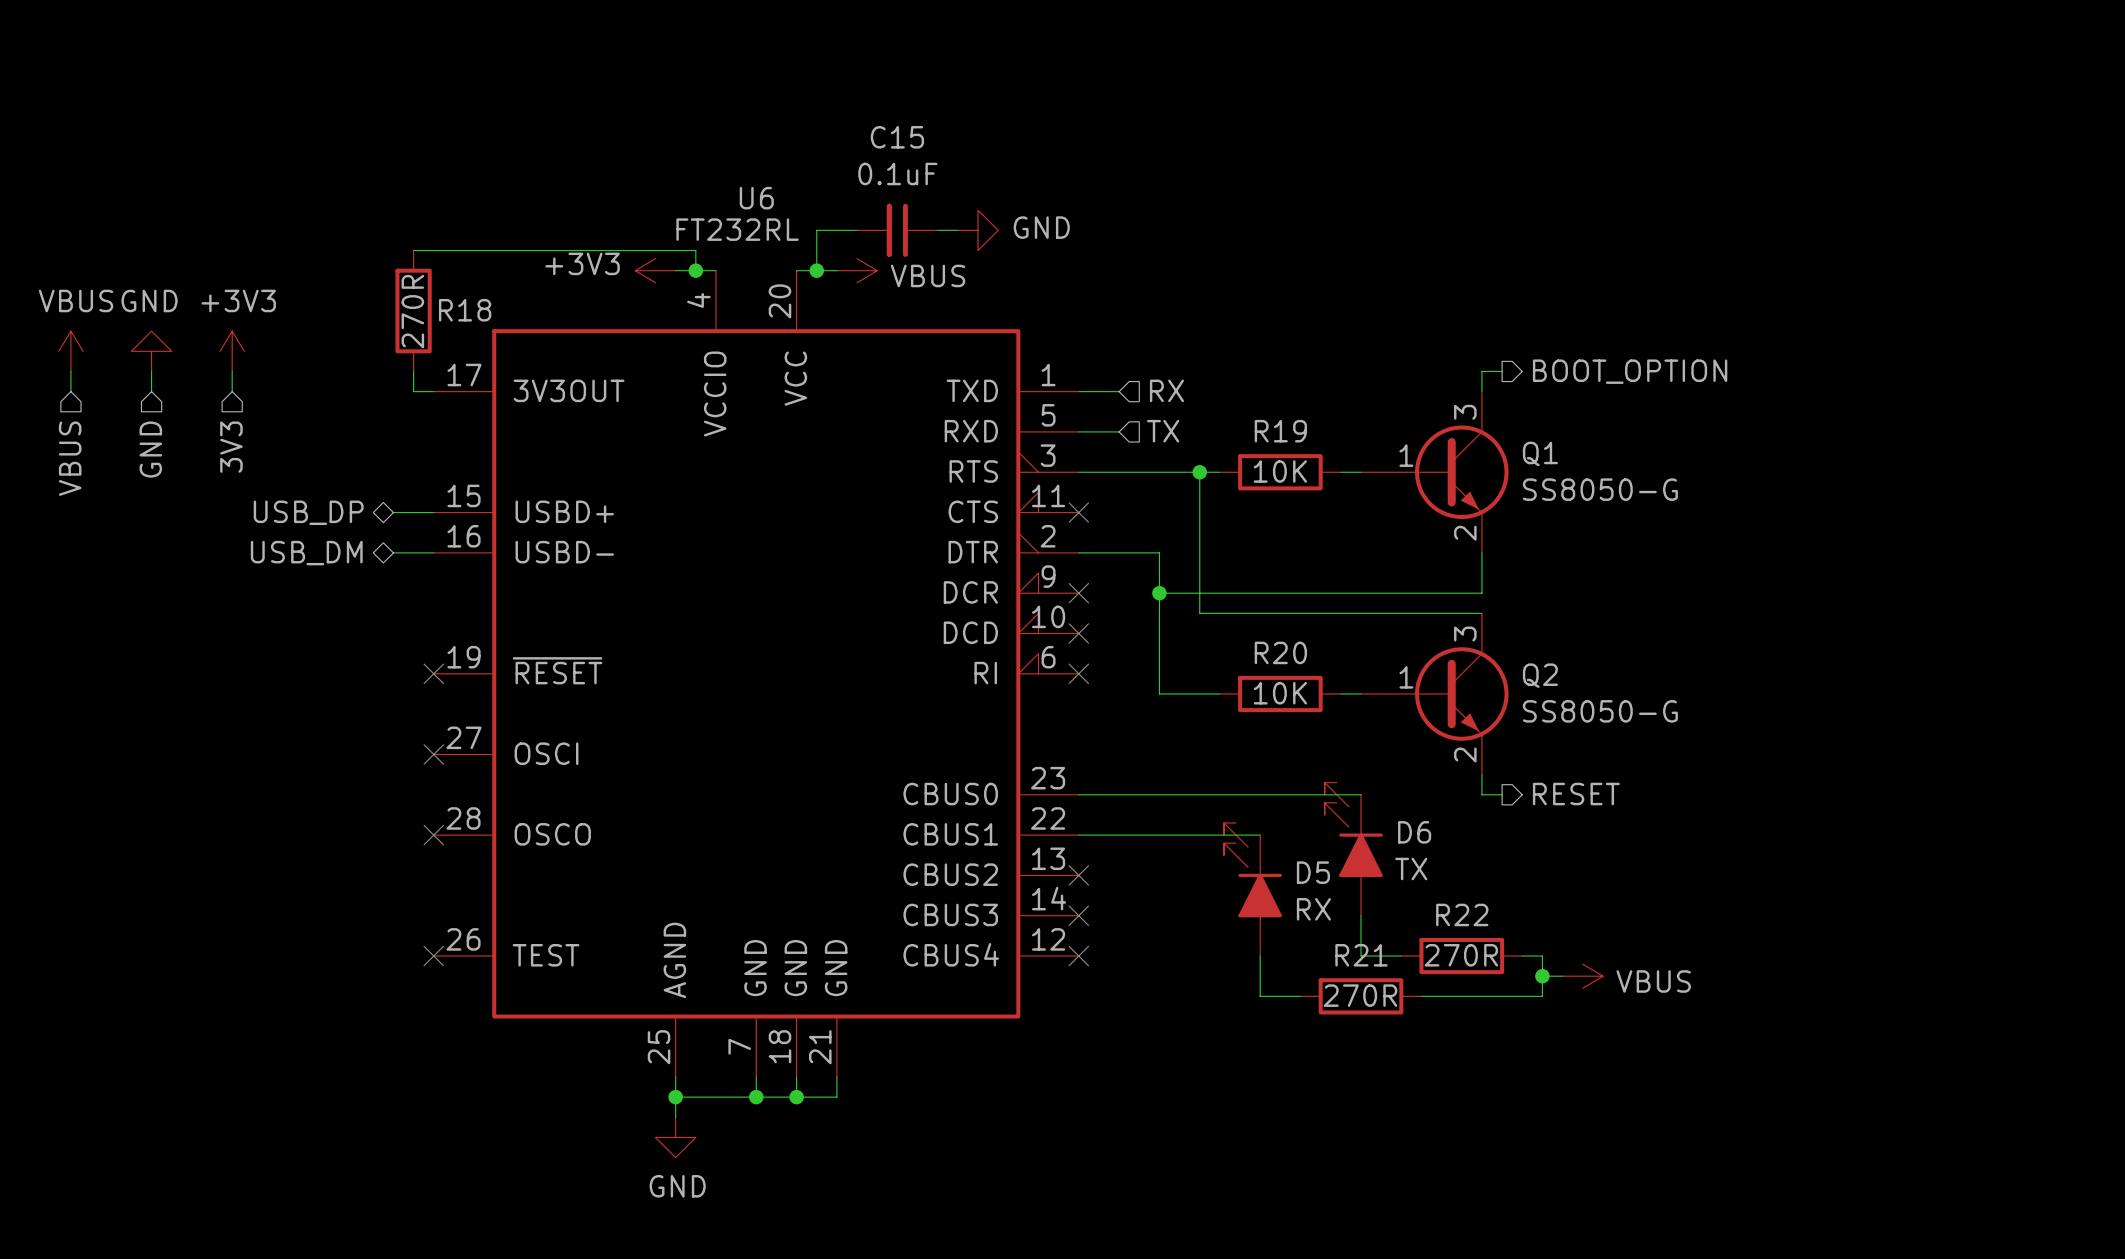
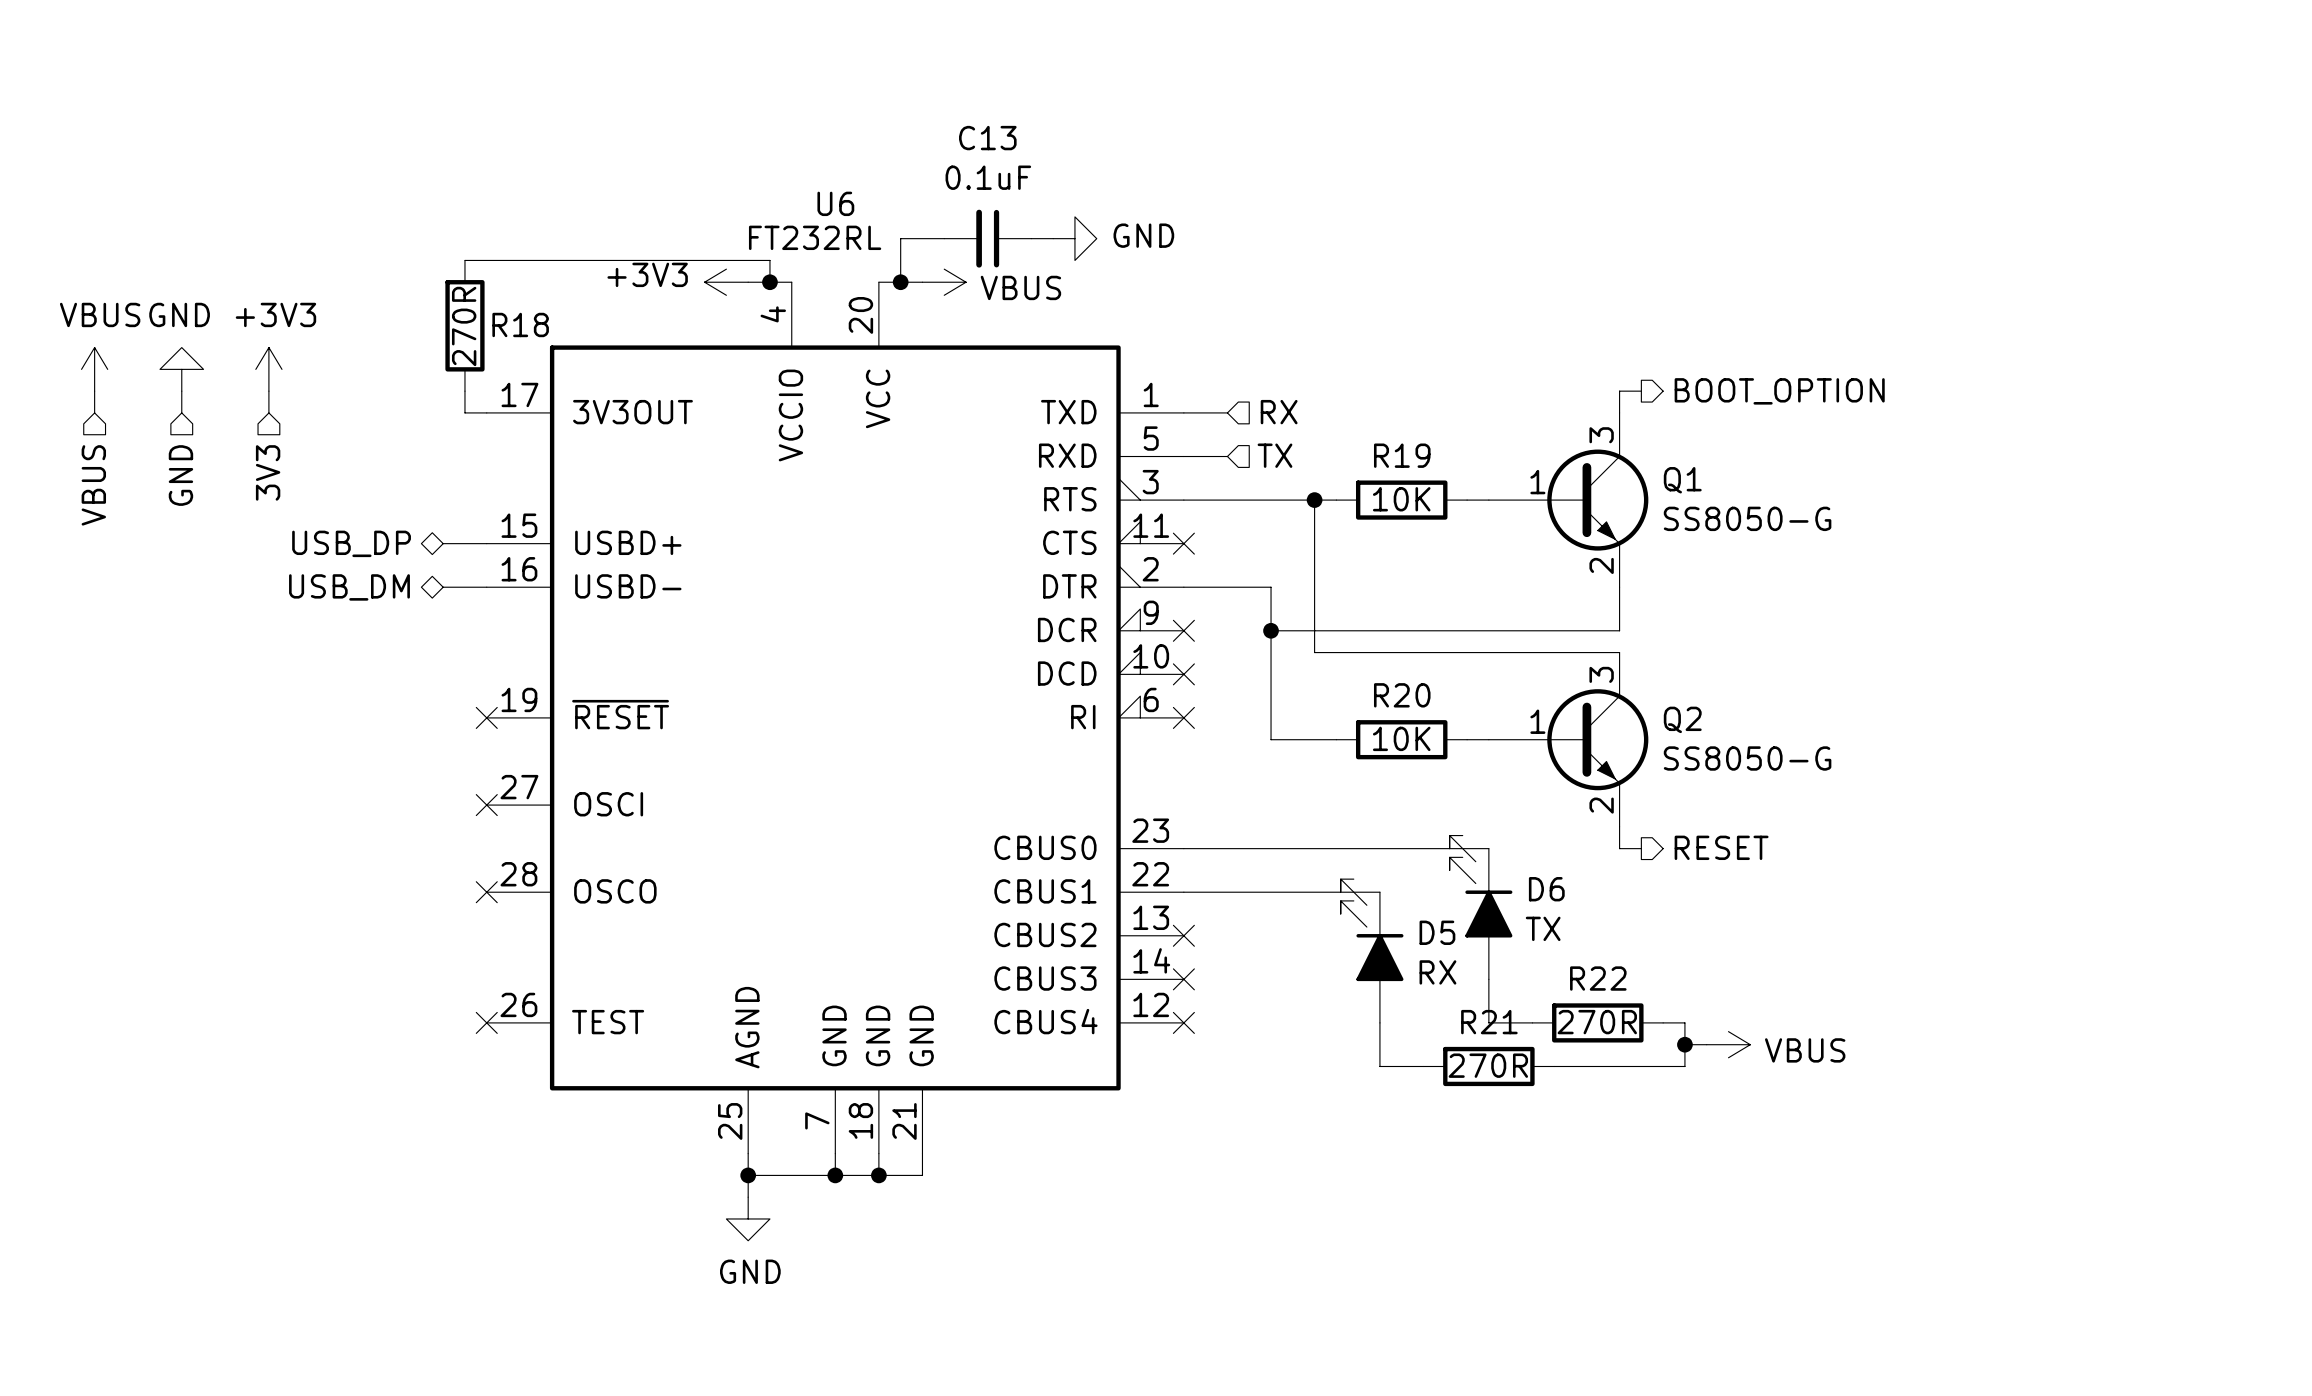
C15 name: C15 (897, 137) -> C13 (987, 138)

